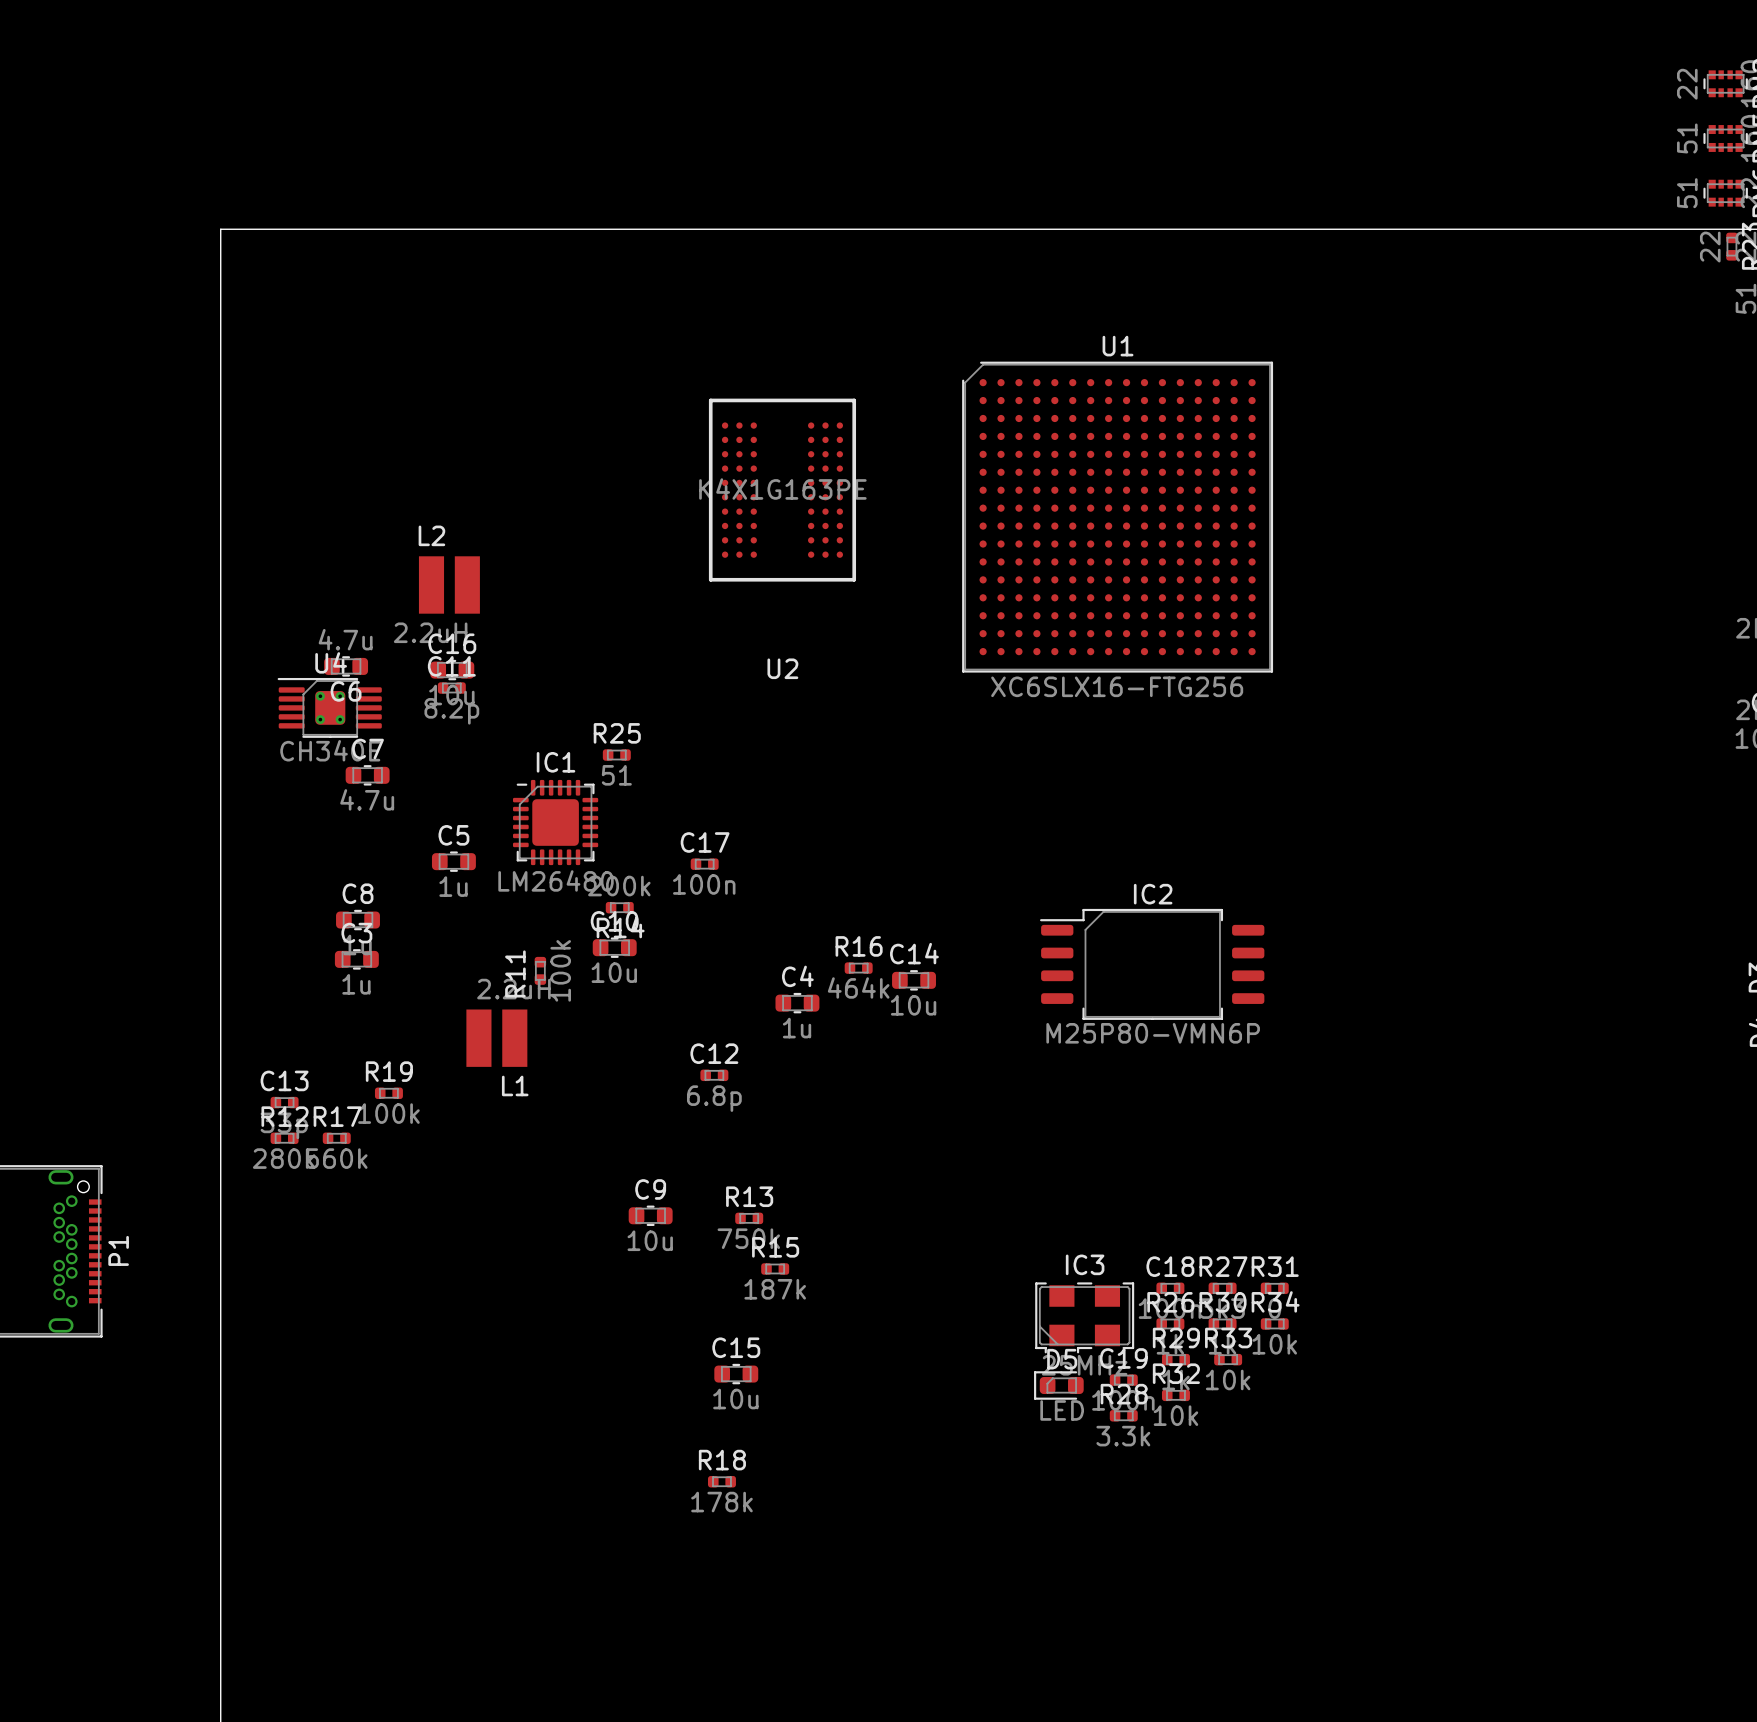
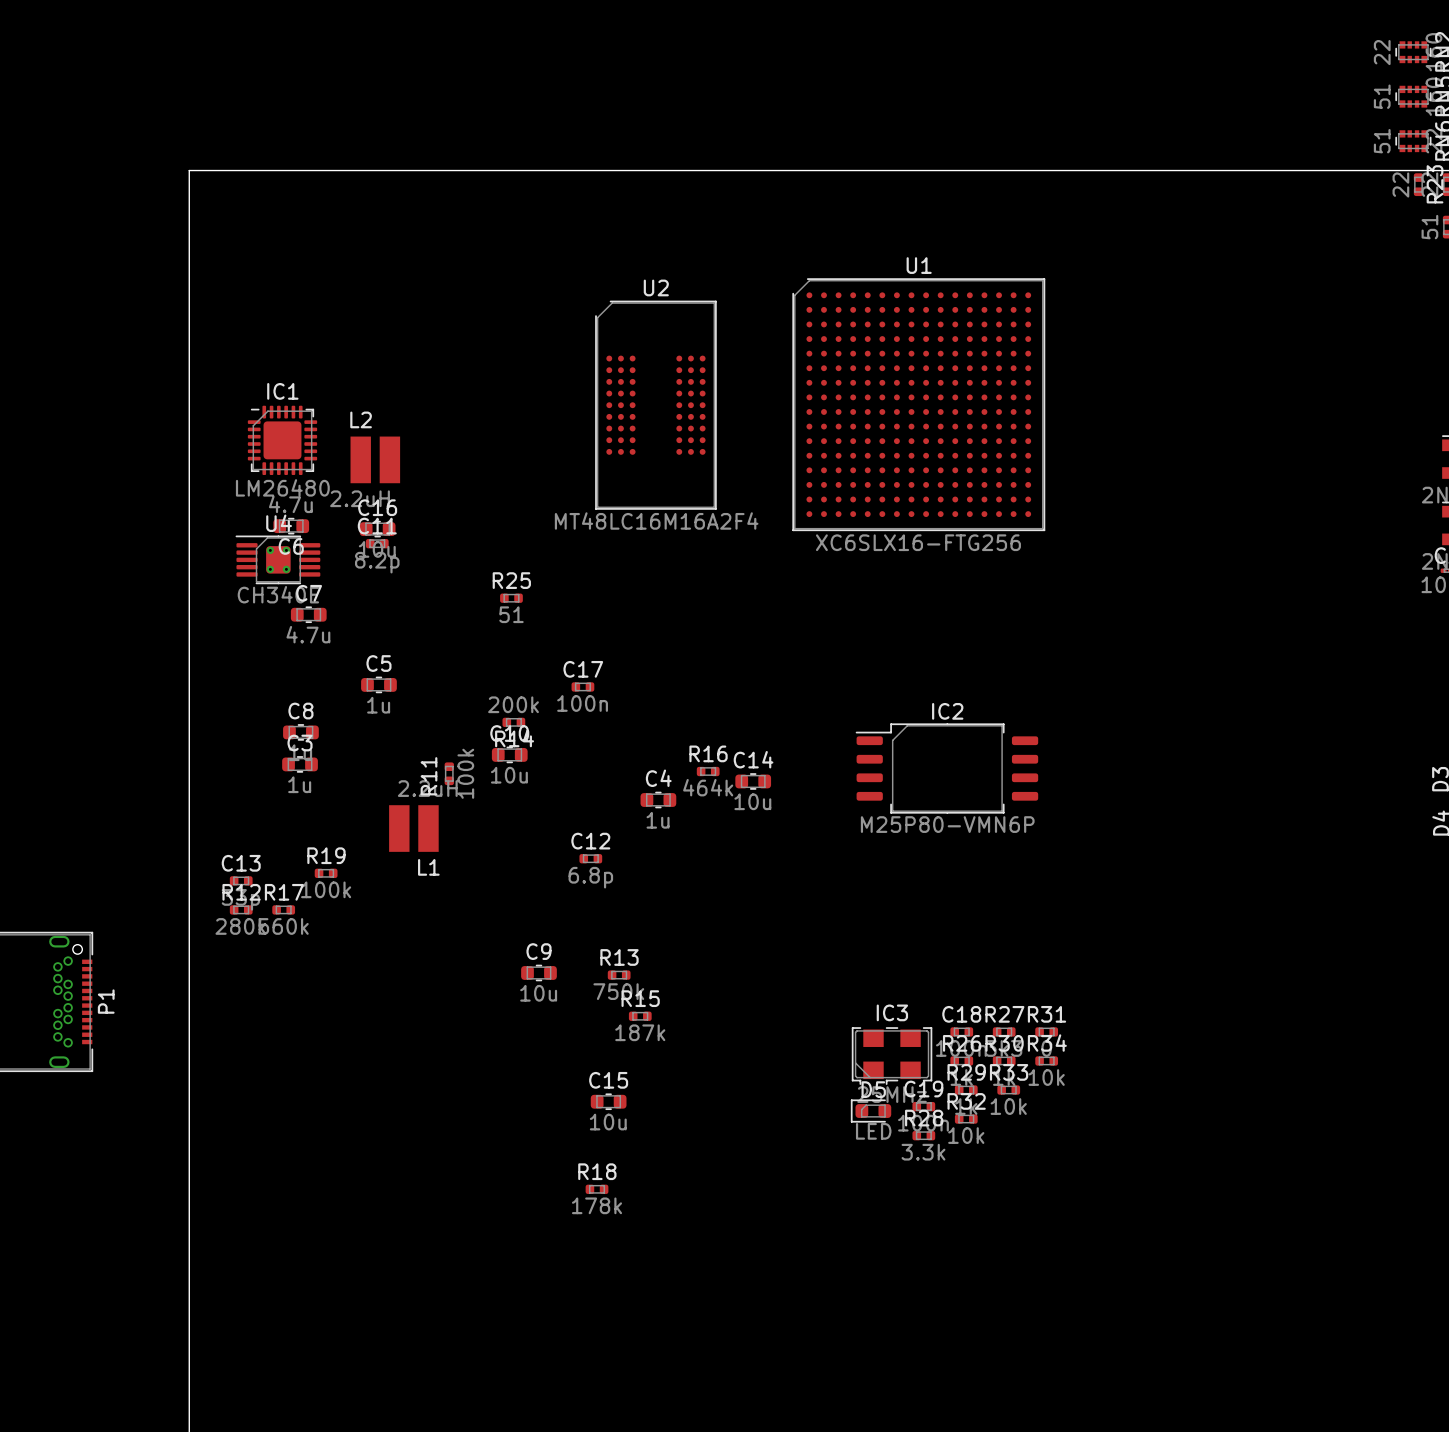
U2 footprint: [708, 398, 857, 582] -> [595, 300, 717, 510]
U2 value: K4X1G163PE (782, 489) -> MT48LC16M16A2F4 (656, 521)
U2 name position: U2 (782, 668) -> U2 (656, 287)
IC1 position: (555, 822) -> (282, 440)

